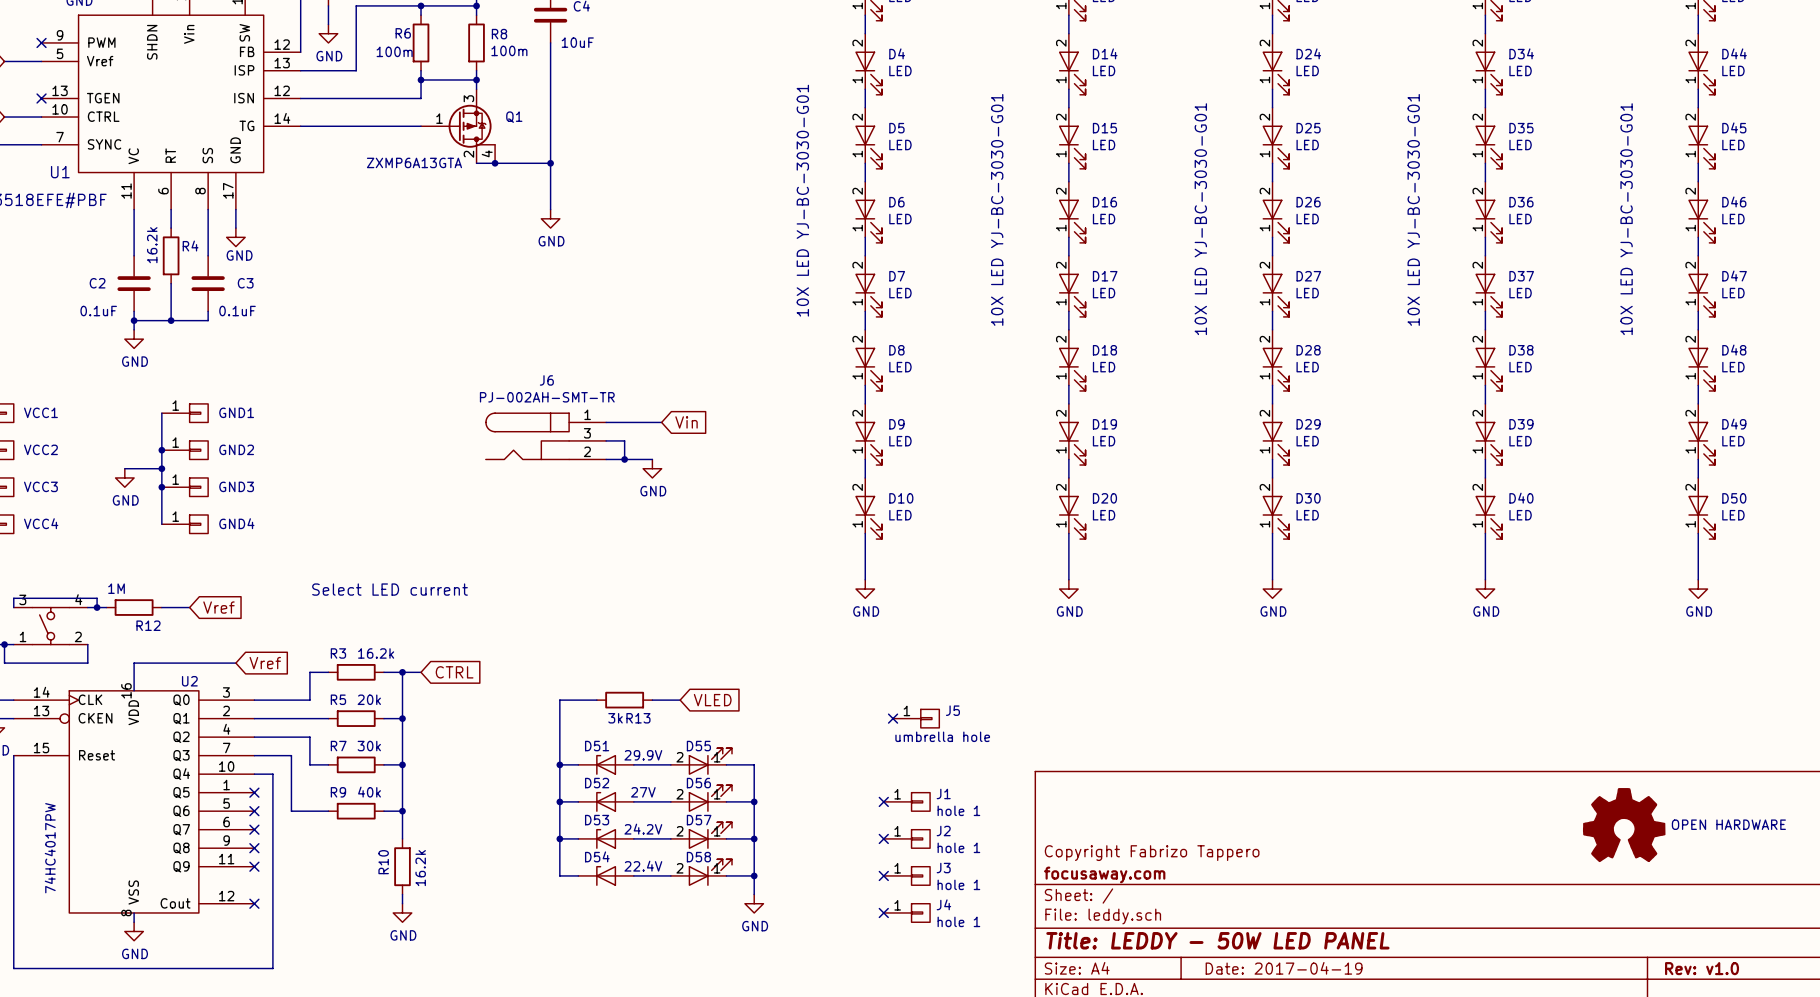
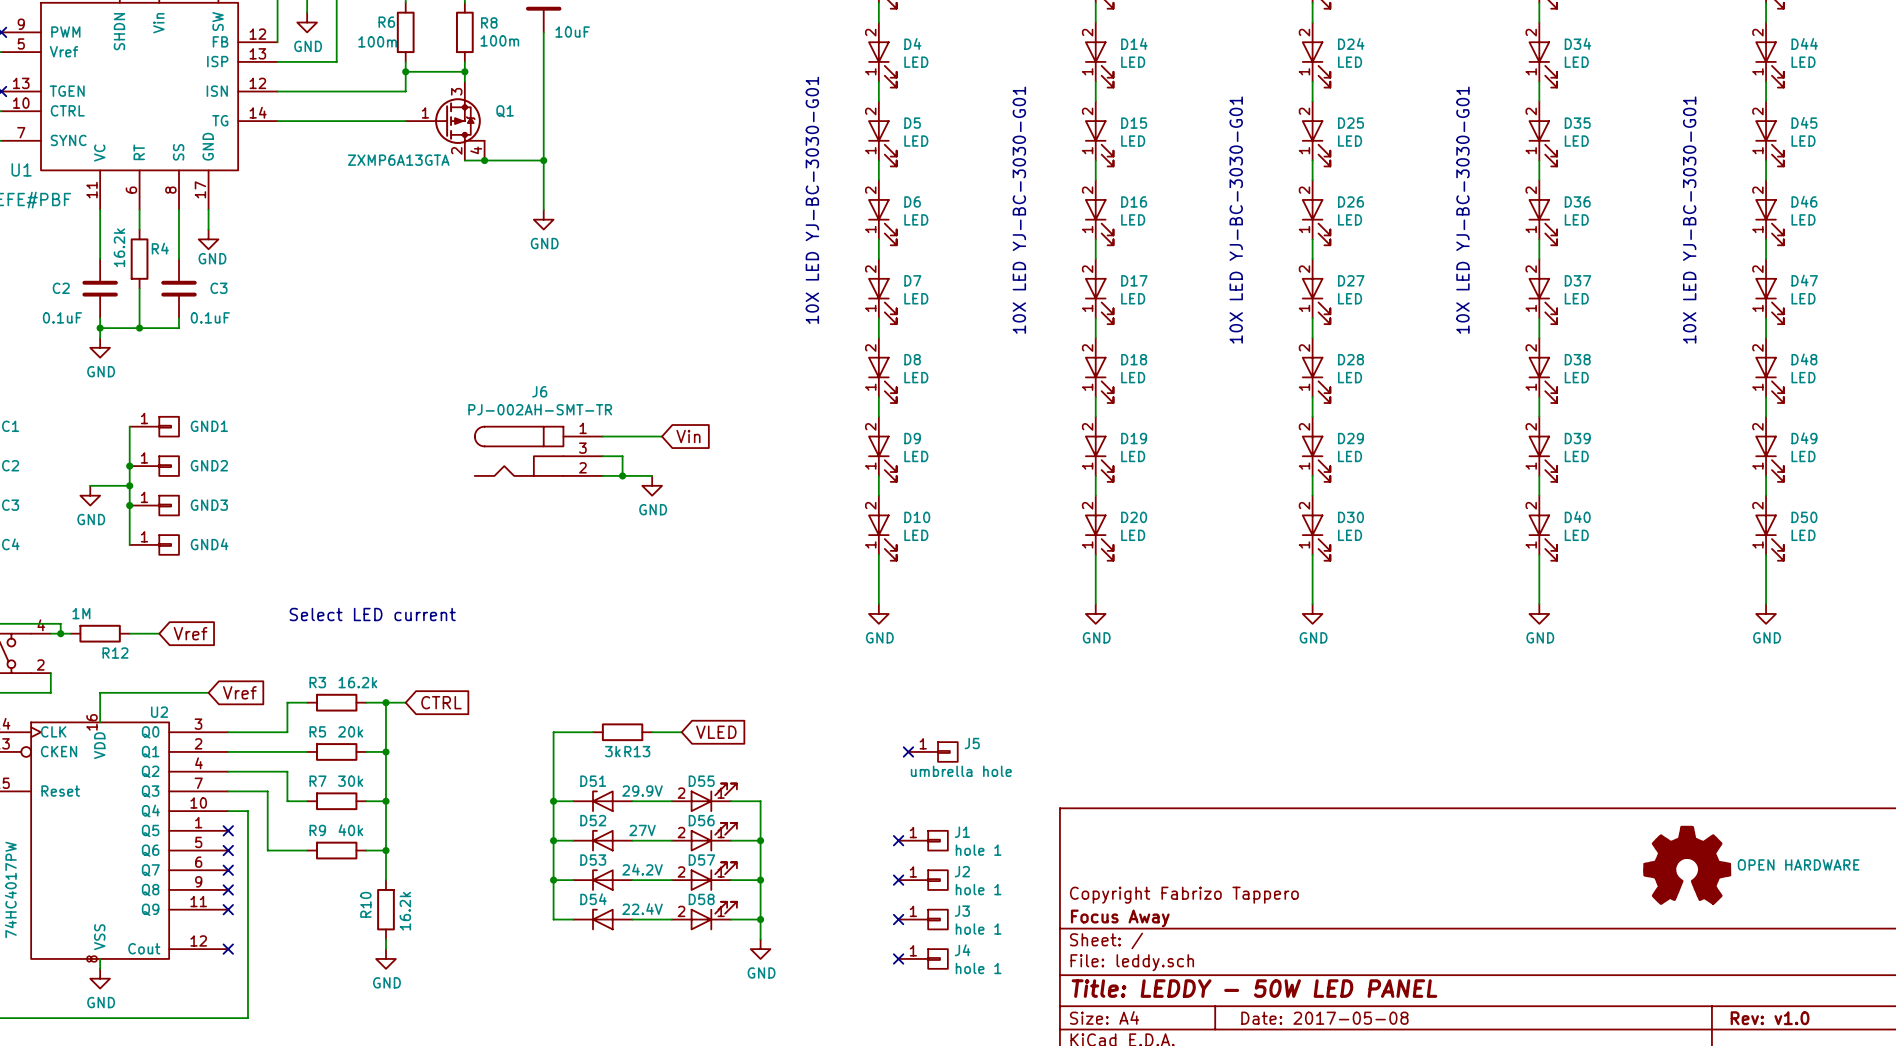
title block: focusaway.com (1104, 874) -> Focus Away (1120, 918)
title block: Date: 2017-04-19 (1284, 968) -> Date: 2017-05-08 (1324, 1018)

